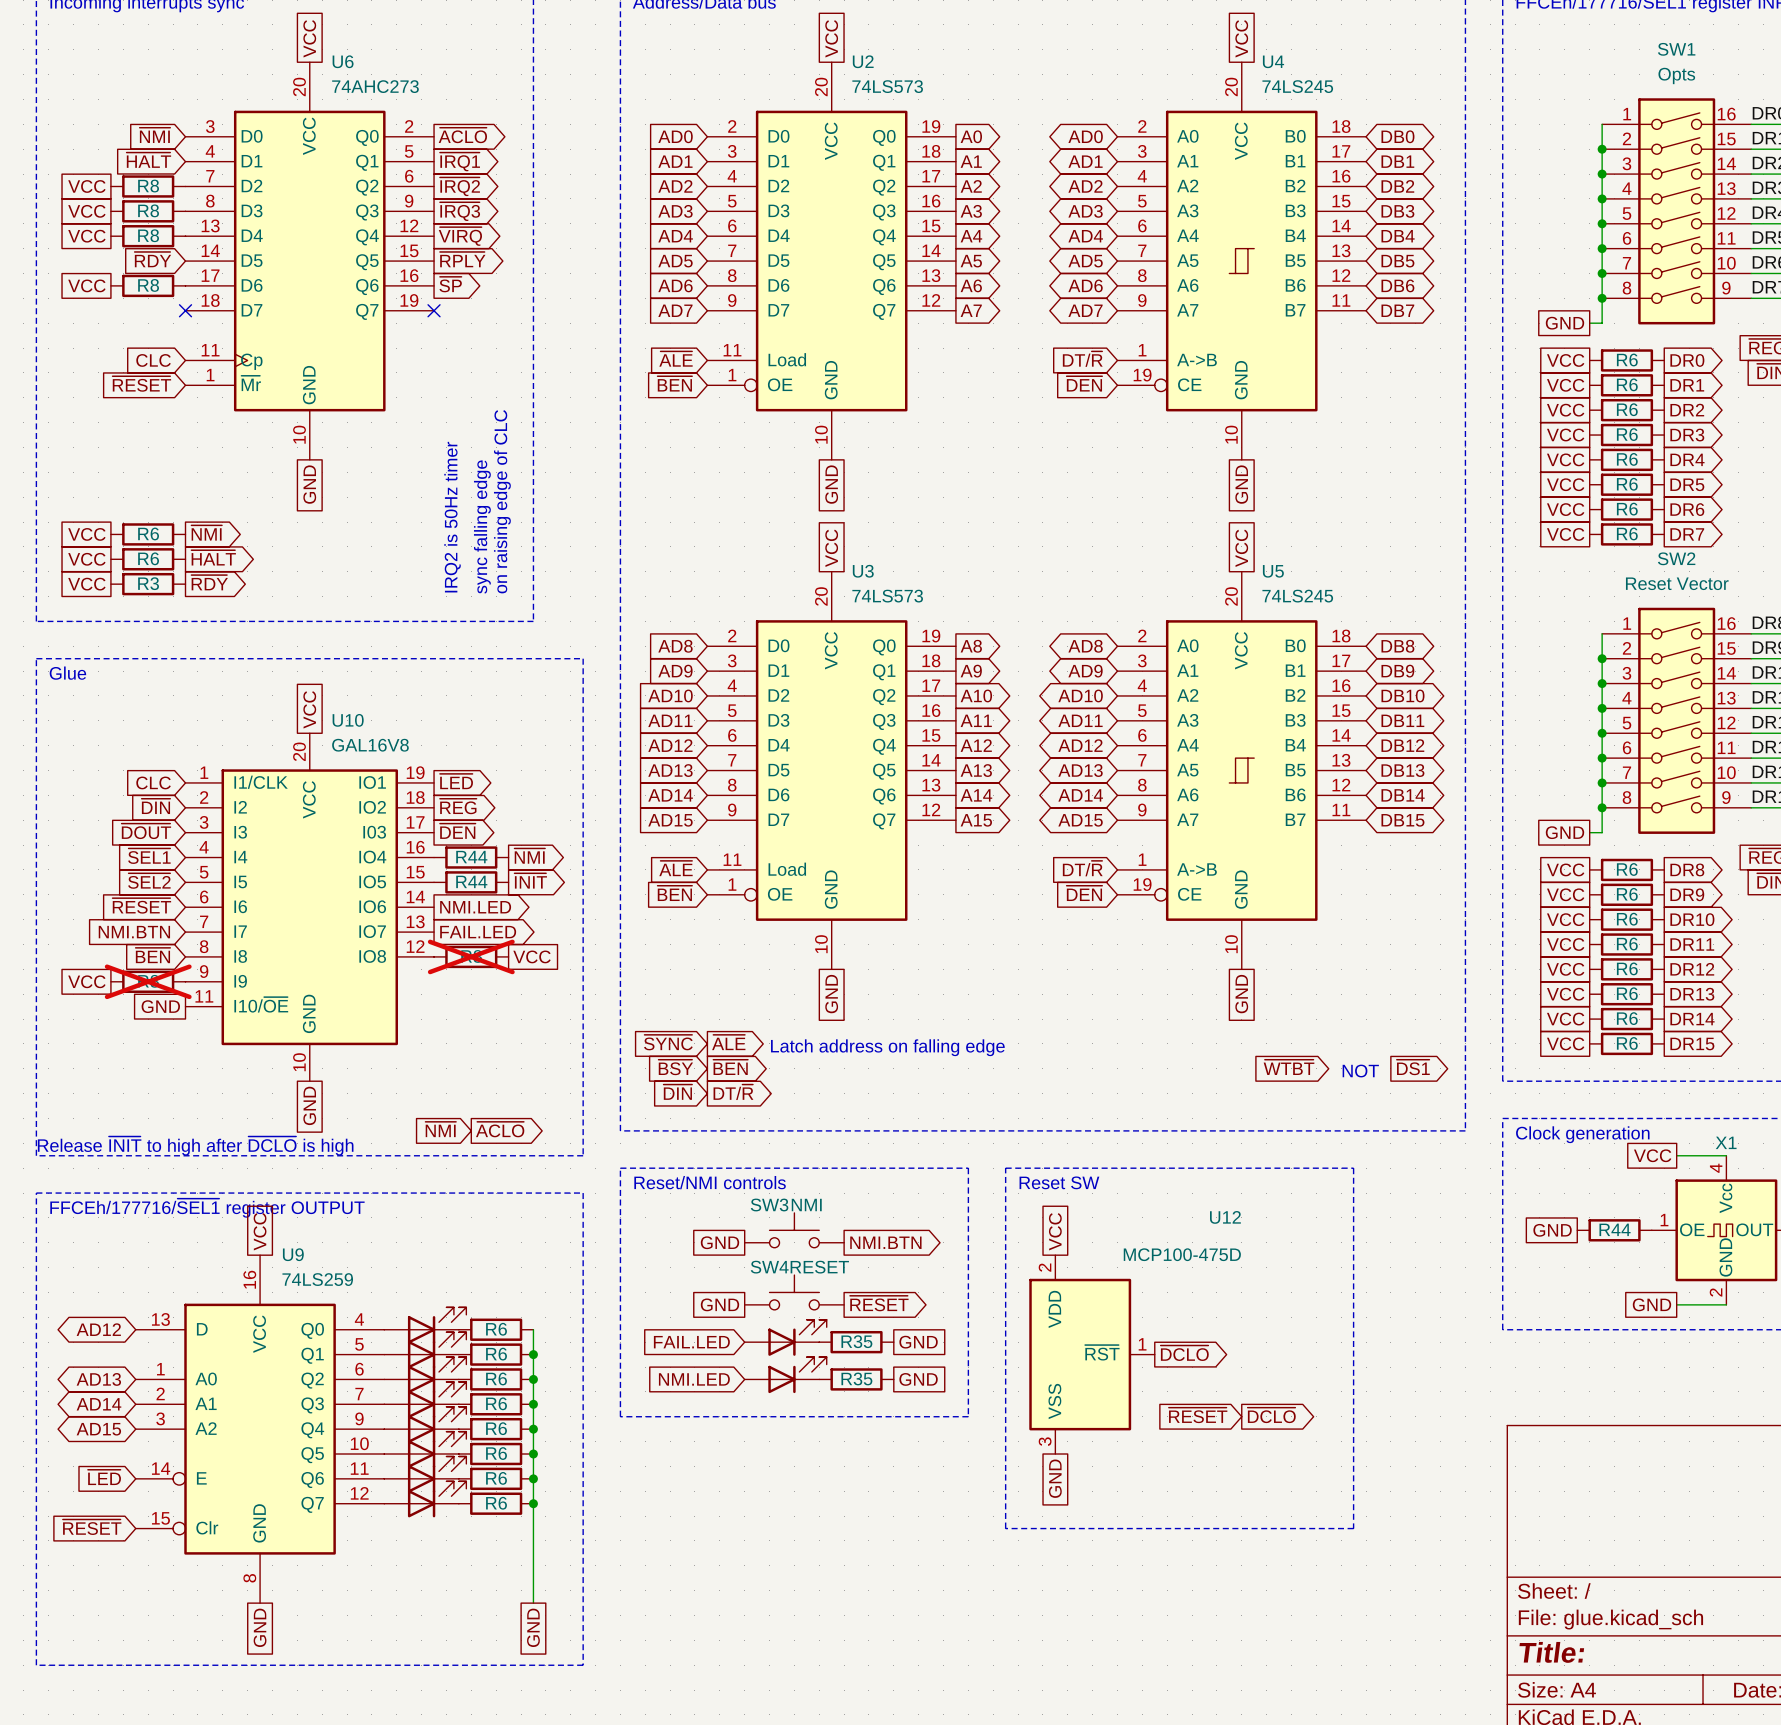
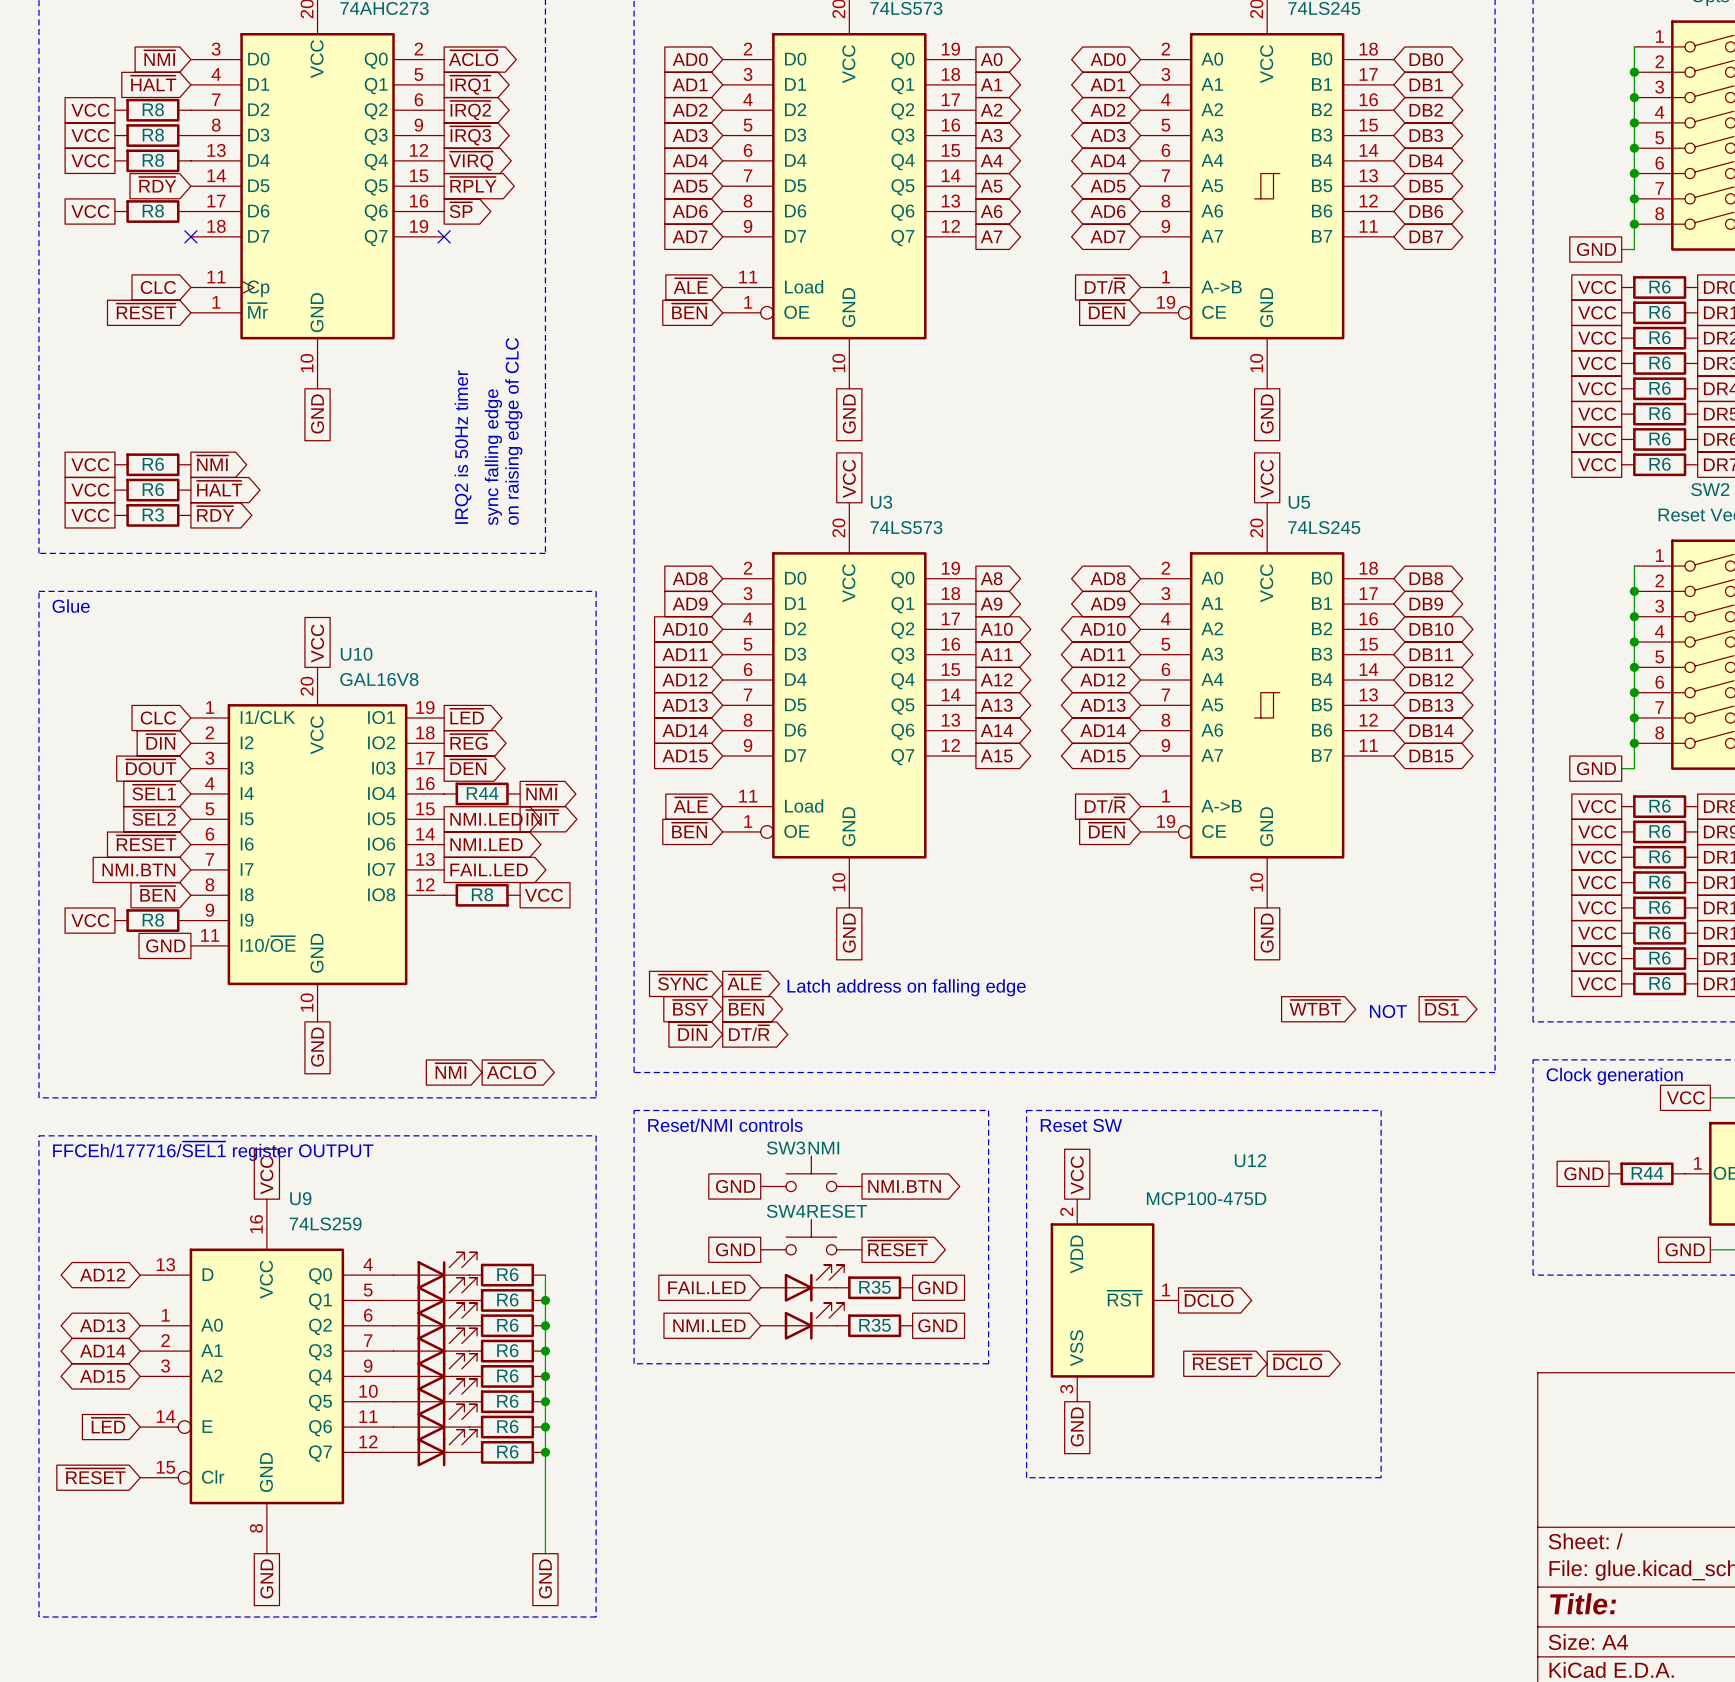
R44: (471, 882) -> none
global label: none -> NMI.LED (486, 819)
R8 do-not-place cross: (471, 956) -> none
R8 do-not-place cross: (148, 981) -> none
text: Release ~{INIT} to high after ~{DCLO} is high (195, 1146) -> none

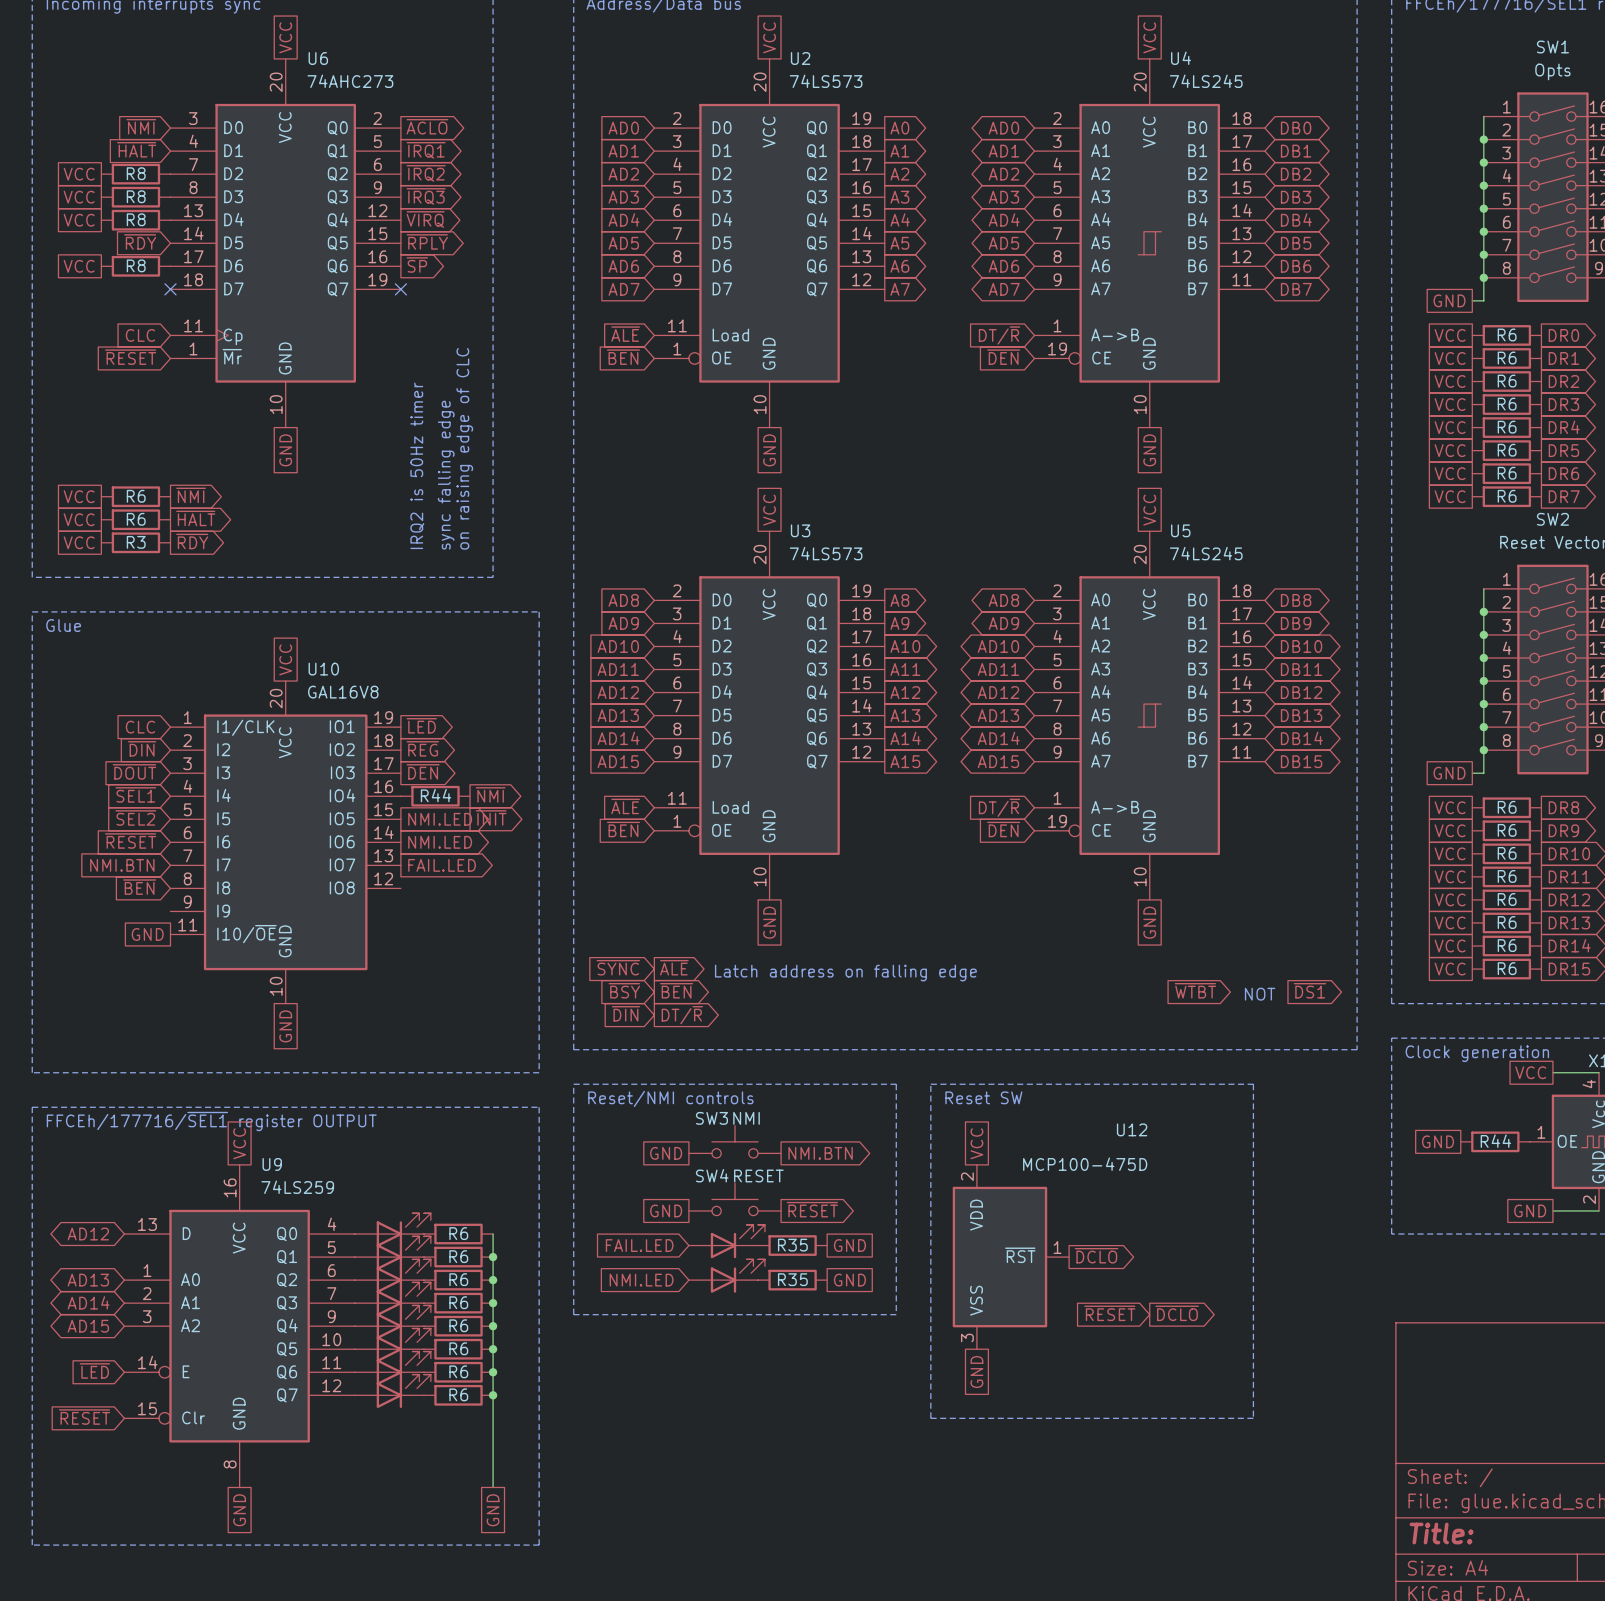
R8: (482, 895) -> none
global label: VCC (543, 895) -> none
global label: VCC (90, 920) -> none
R8: (152, 920) -> none
global label: ~{NMI} (451, 1071) -> none
global label: ~{ACLO} (511, 1071) -> none

